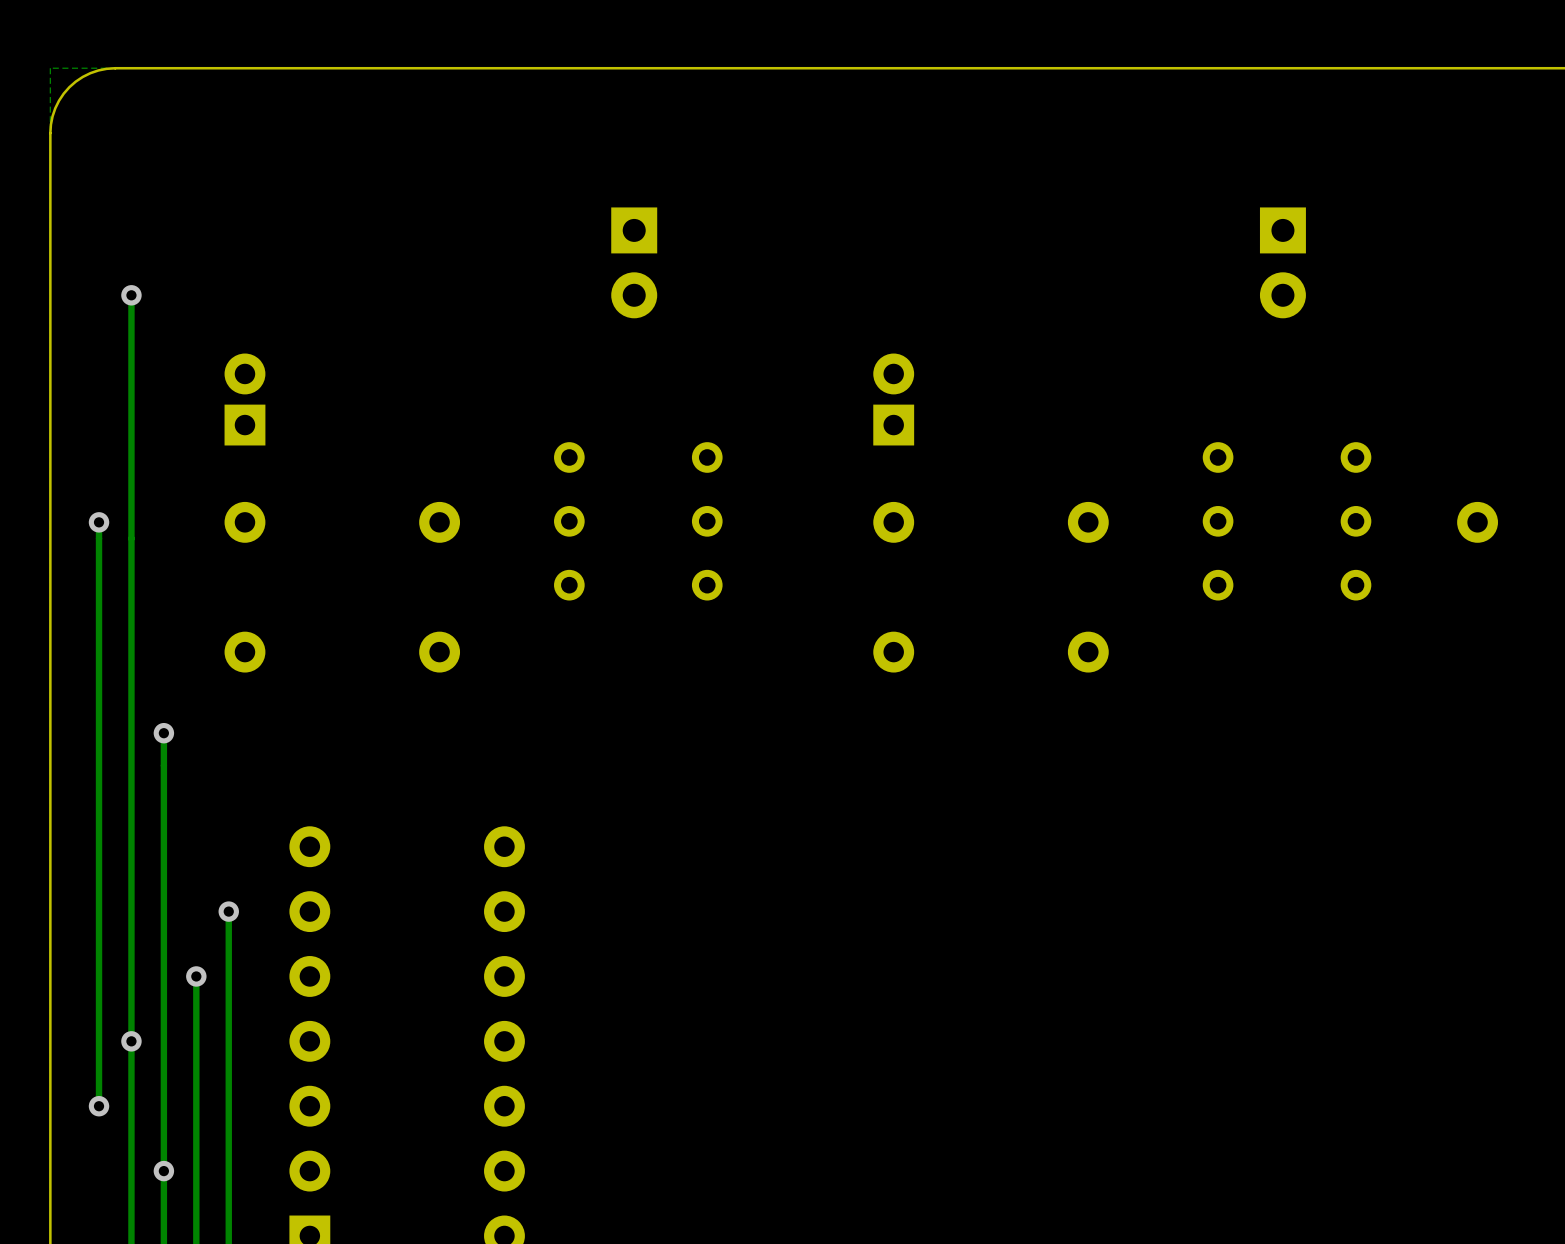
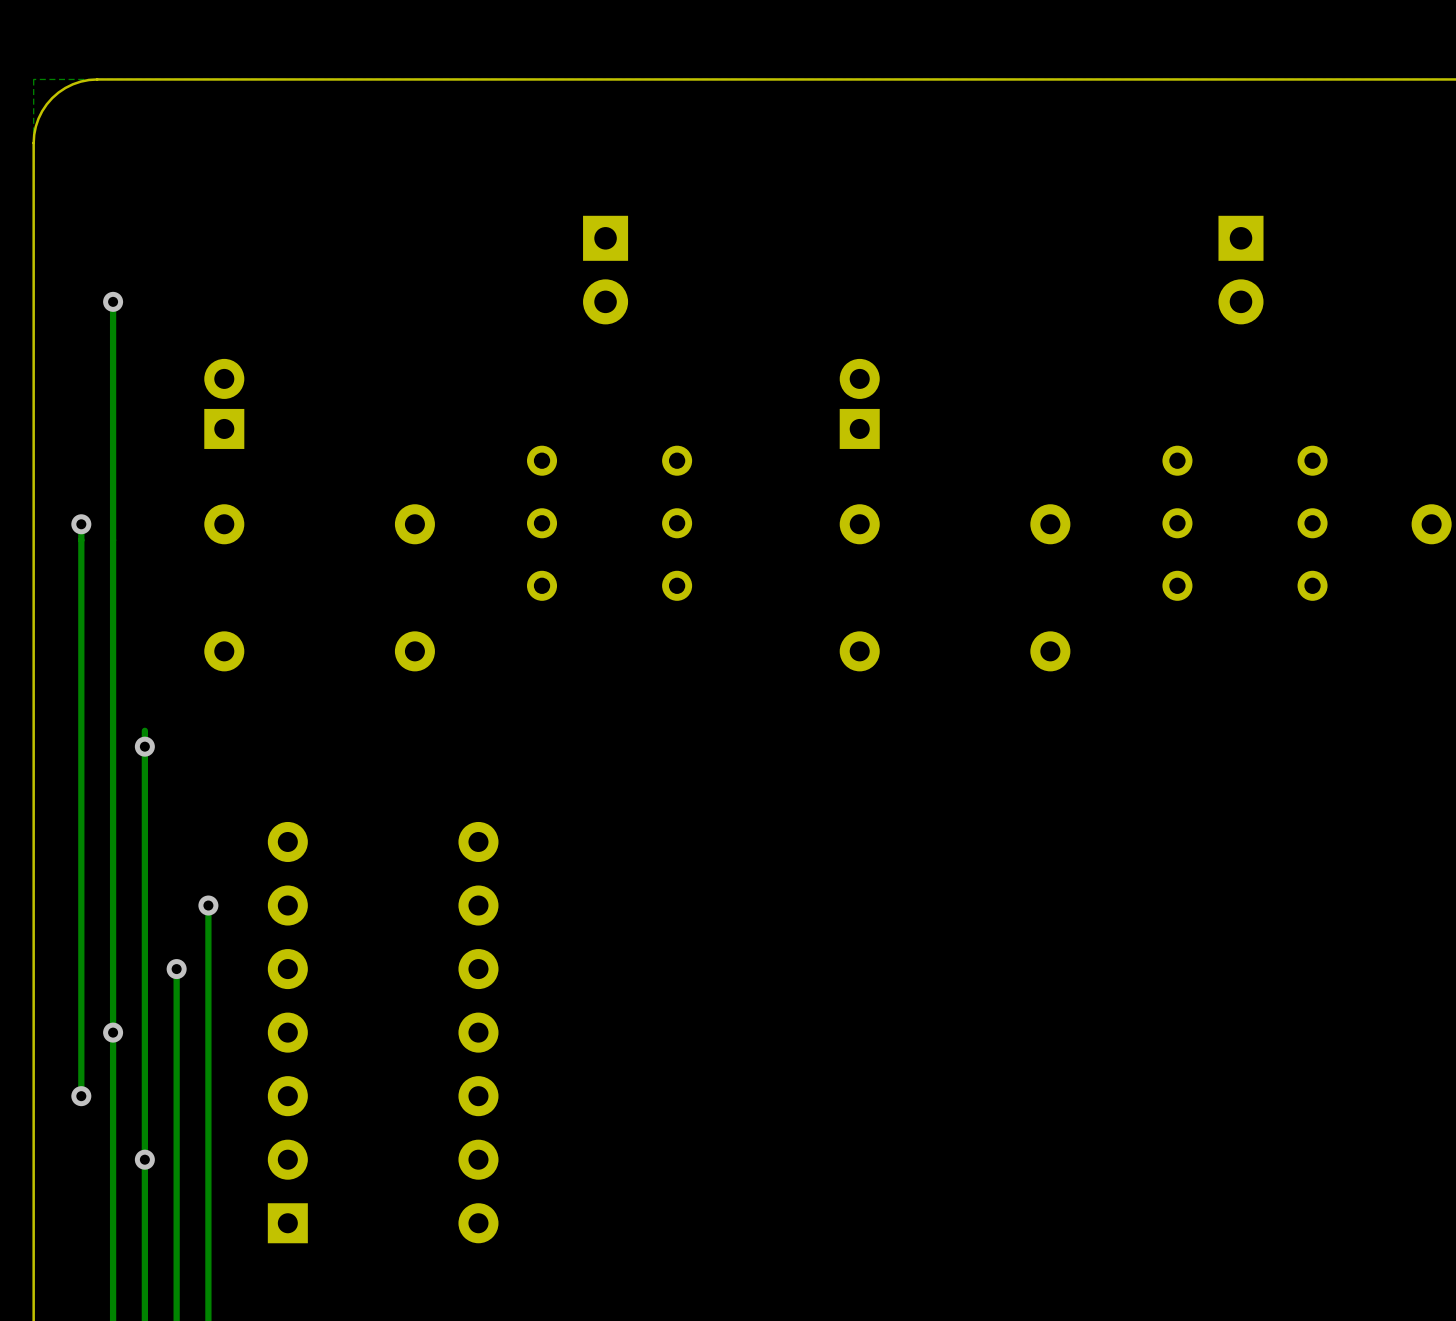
via position: (163, 733) -> (144, 746)

